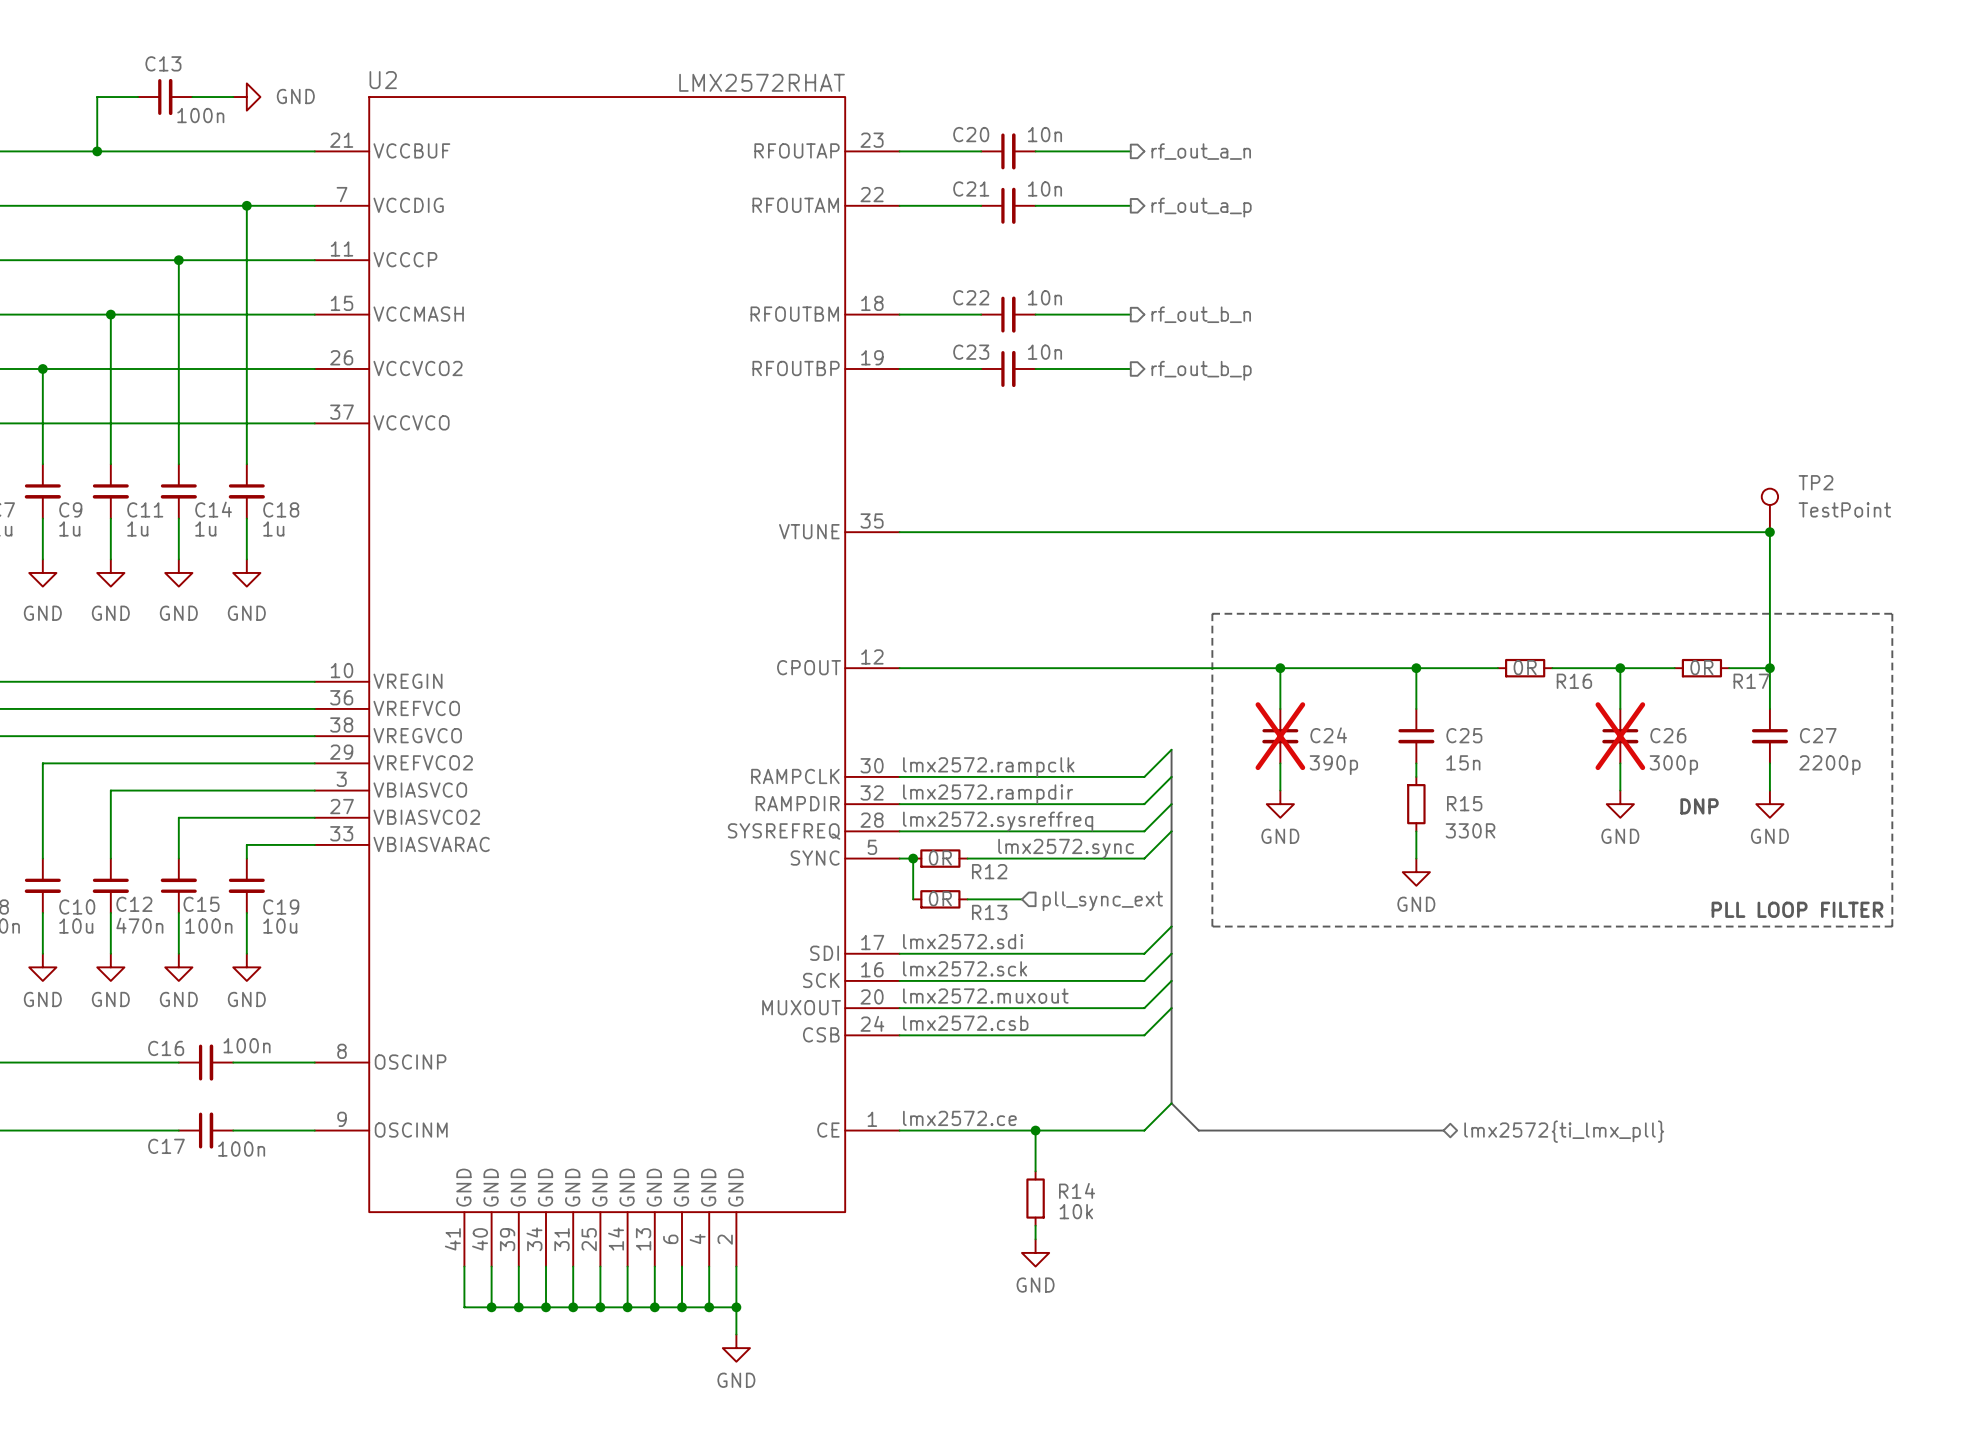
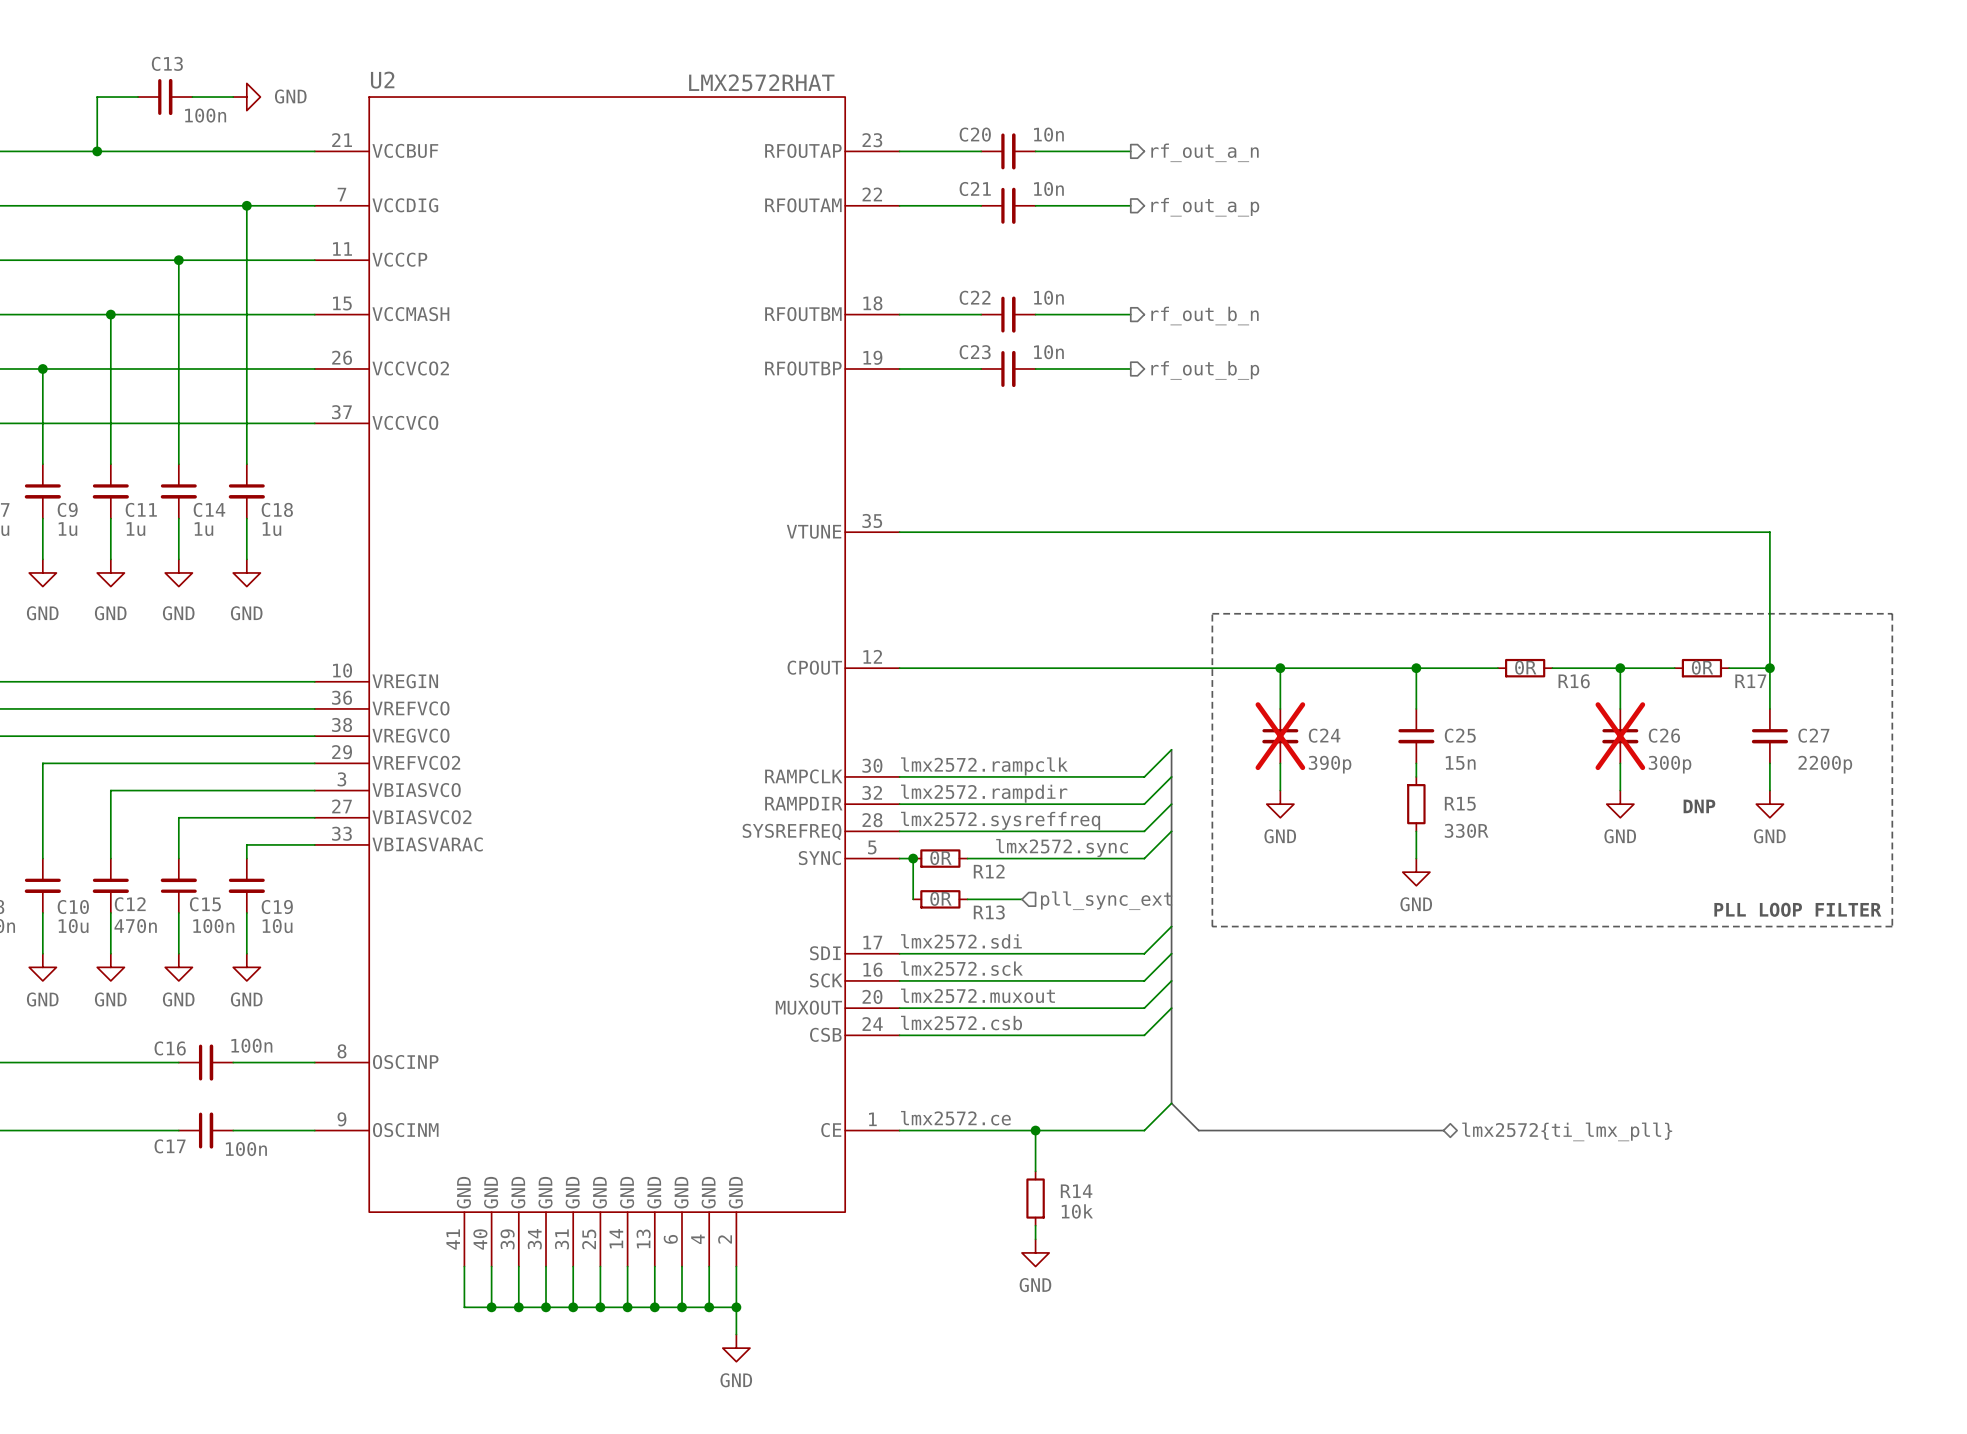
TP2: TestPoint (1769, 510) -> none
junction: (1769, 532) -> none

